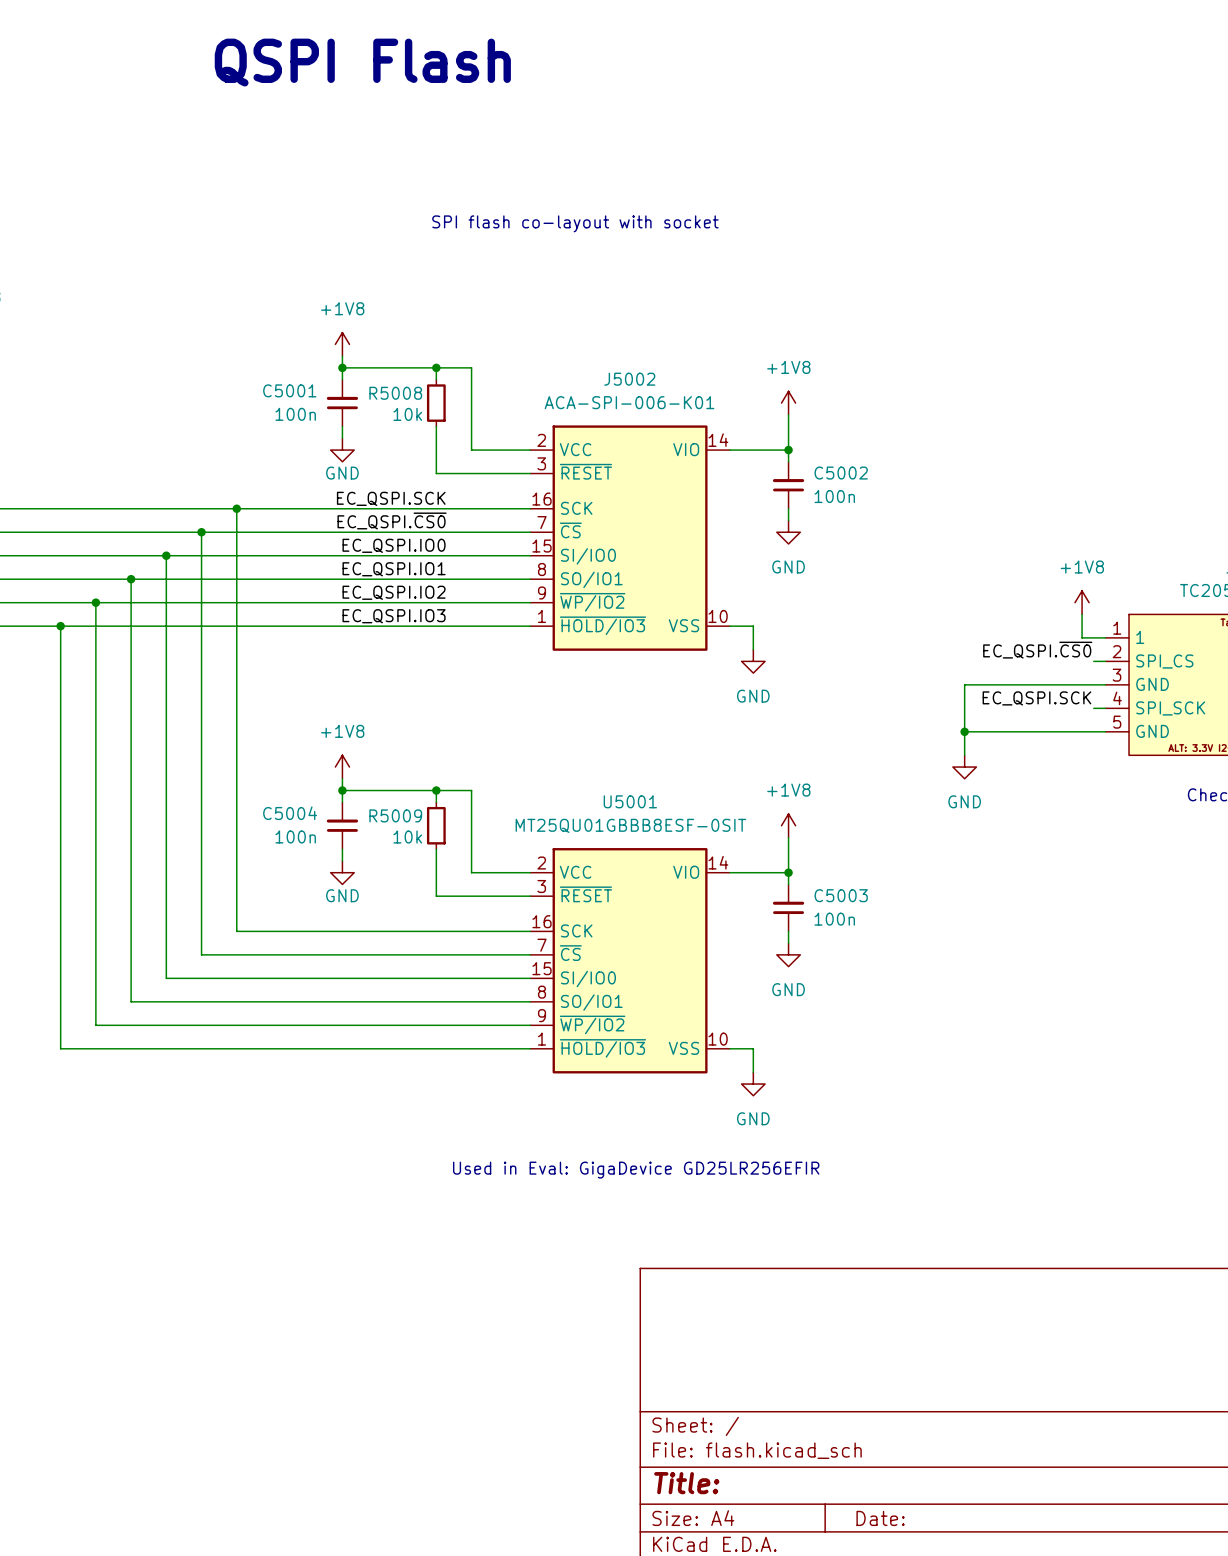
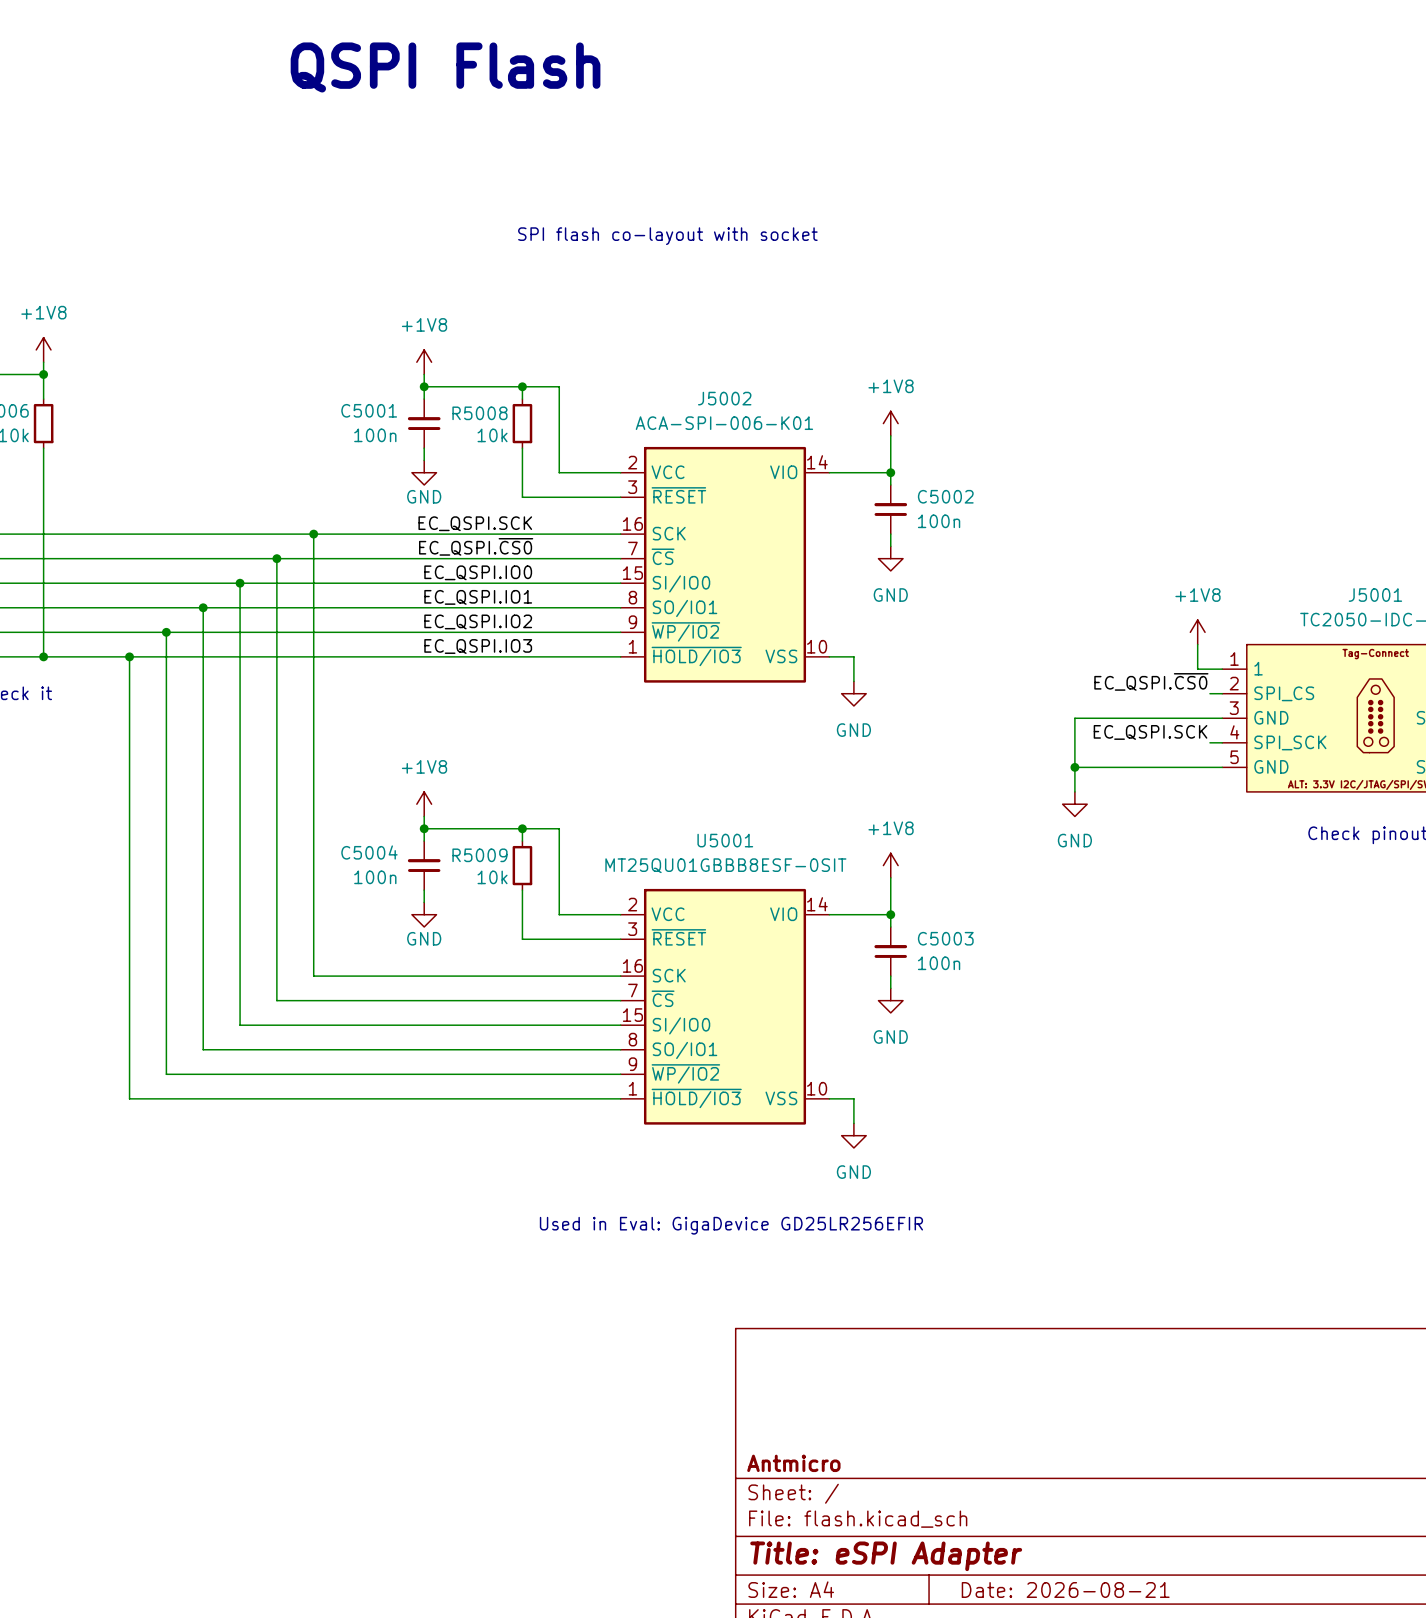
title block: none -> Antmicro (793, 1463)
title block: Title: (686, 1483) -> Title: eSPI Adapter (886, 1556)
title block: Date: (880, 1518) -> Date: 2026-08-21 (1065, 1589)

